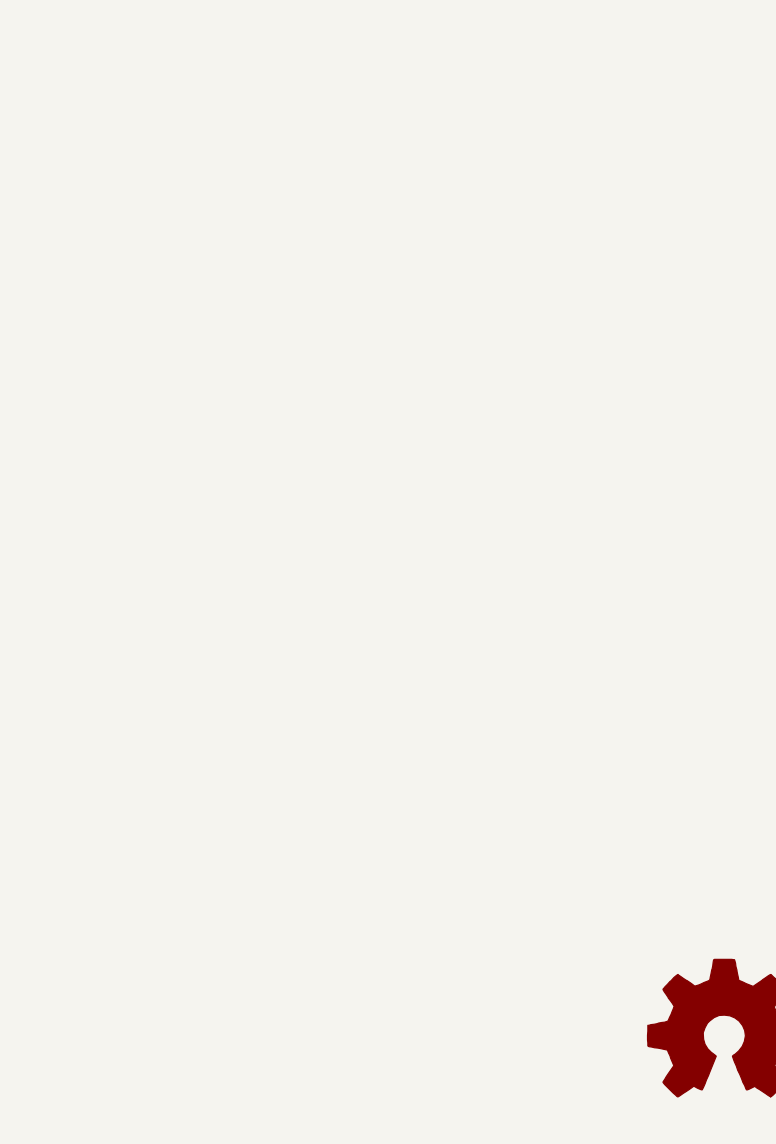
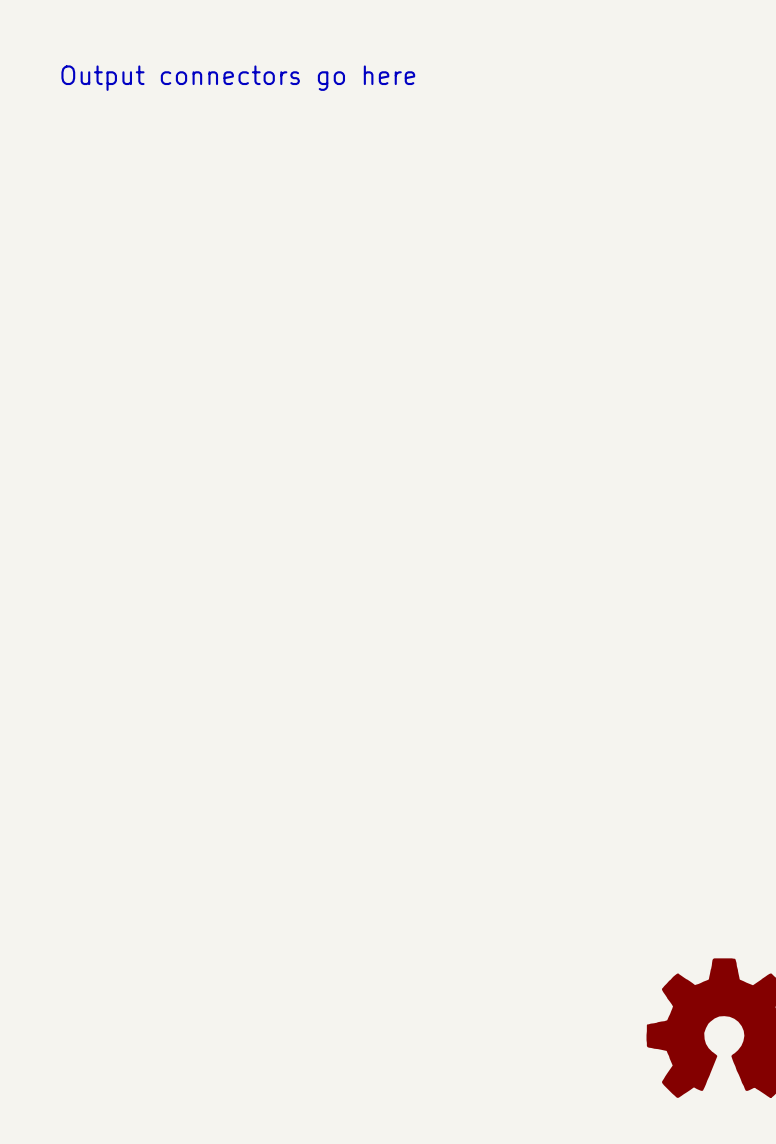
text: none -> Output connectors go here (238, 78)

